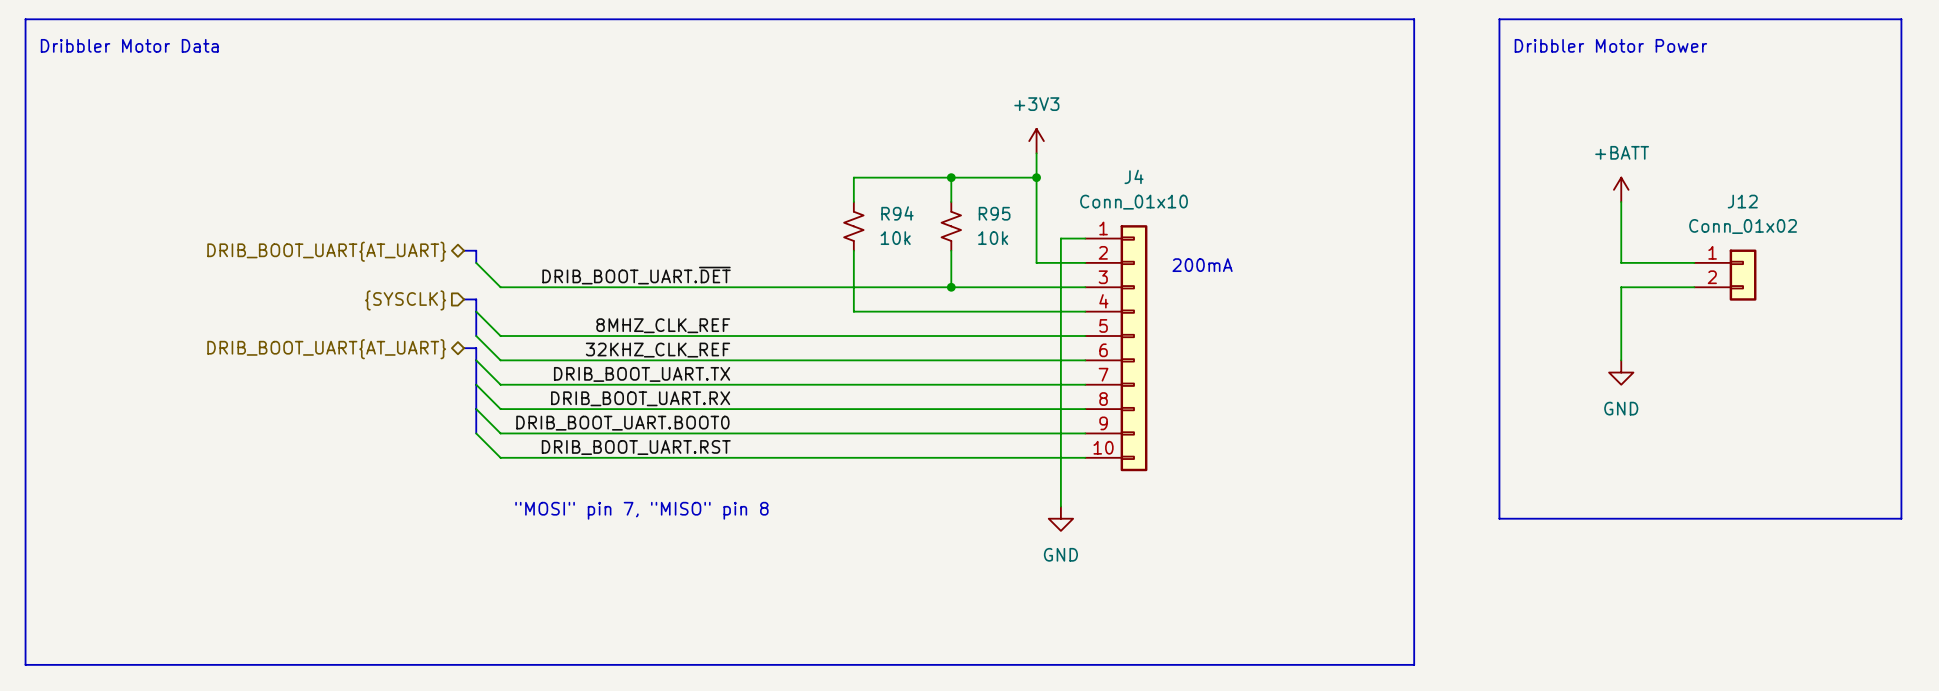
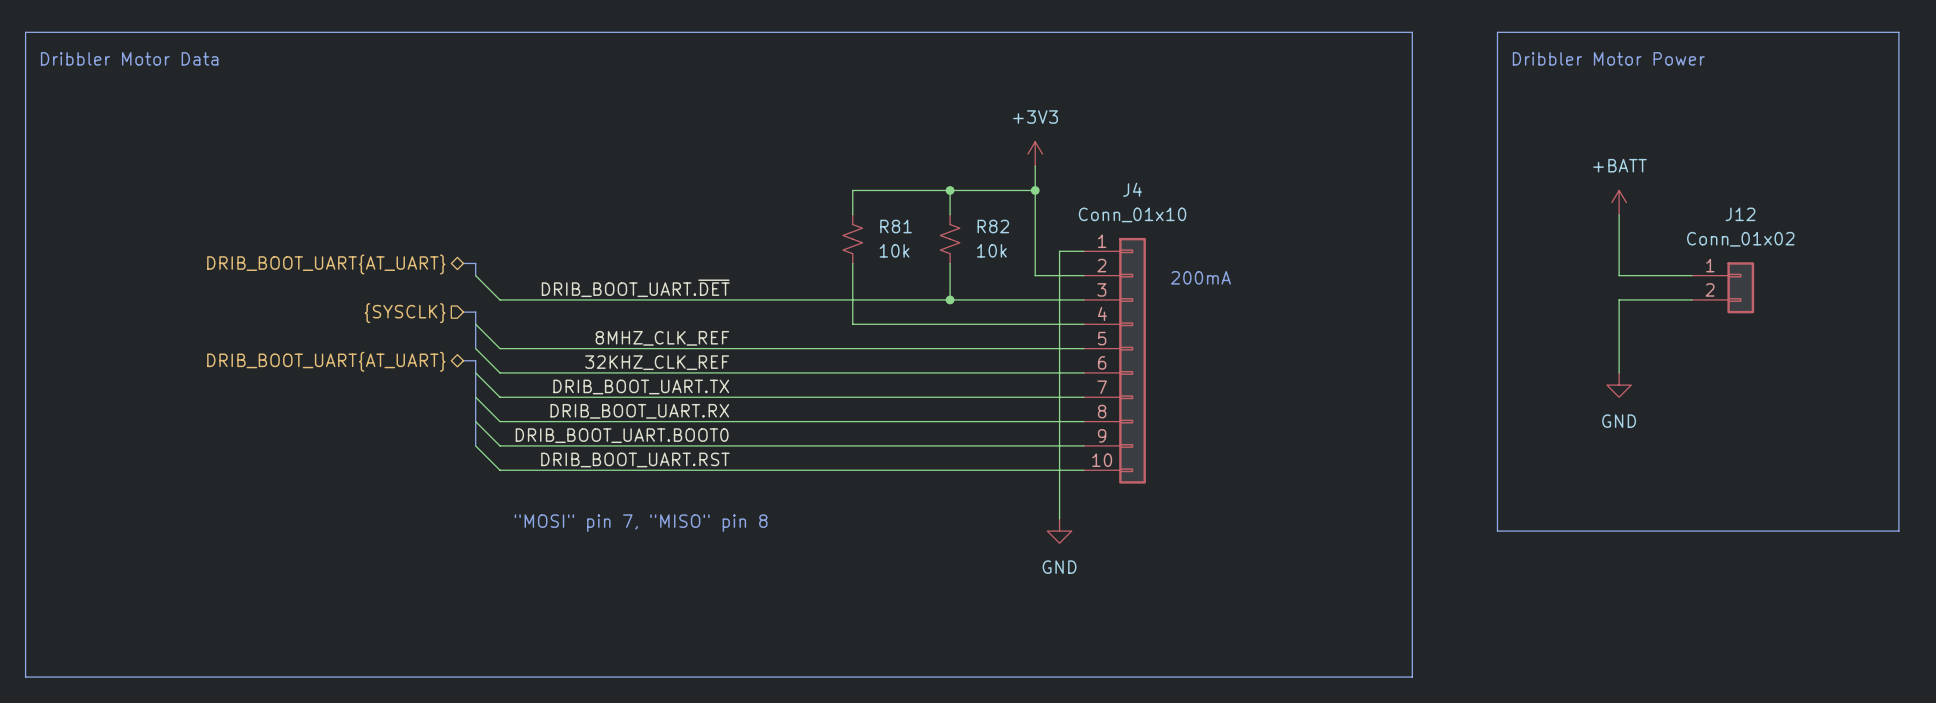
R94 name: R94 (897, 213) -> R81 (896, 226)
R95 name: R95 (994, 213) -> R82 (993, 226)

